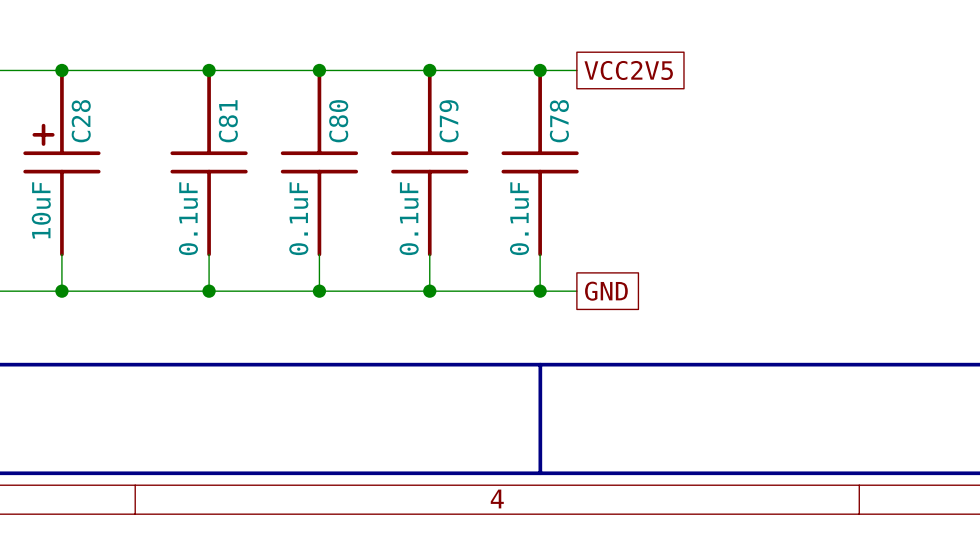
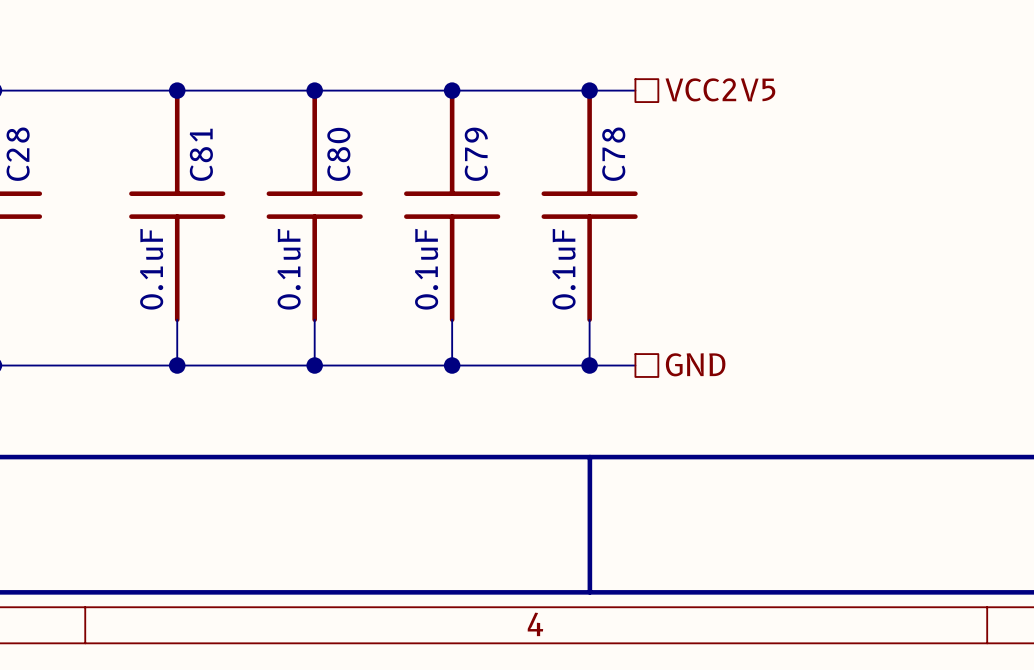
hierarchical label: none -> VCC2V5 (720, 89)
global label: VCC2V5 (628, 70) -> none
hierarchical label: none -> GND (695, 364)
global label: GND (606, 291) -> none

